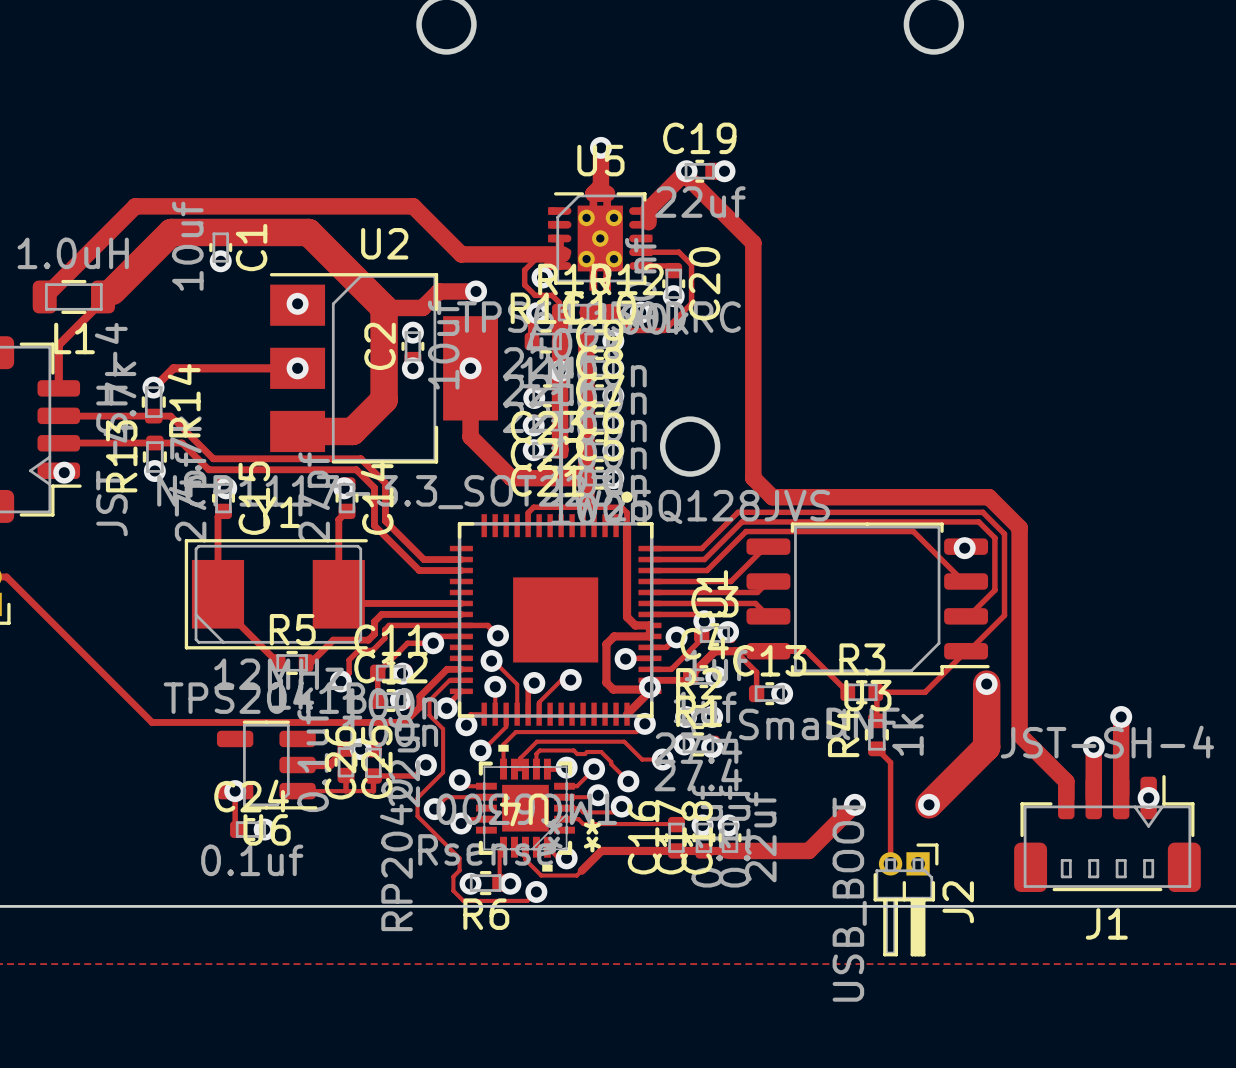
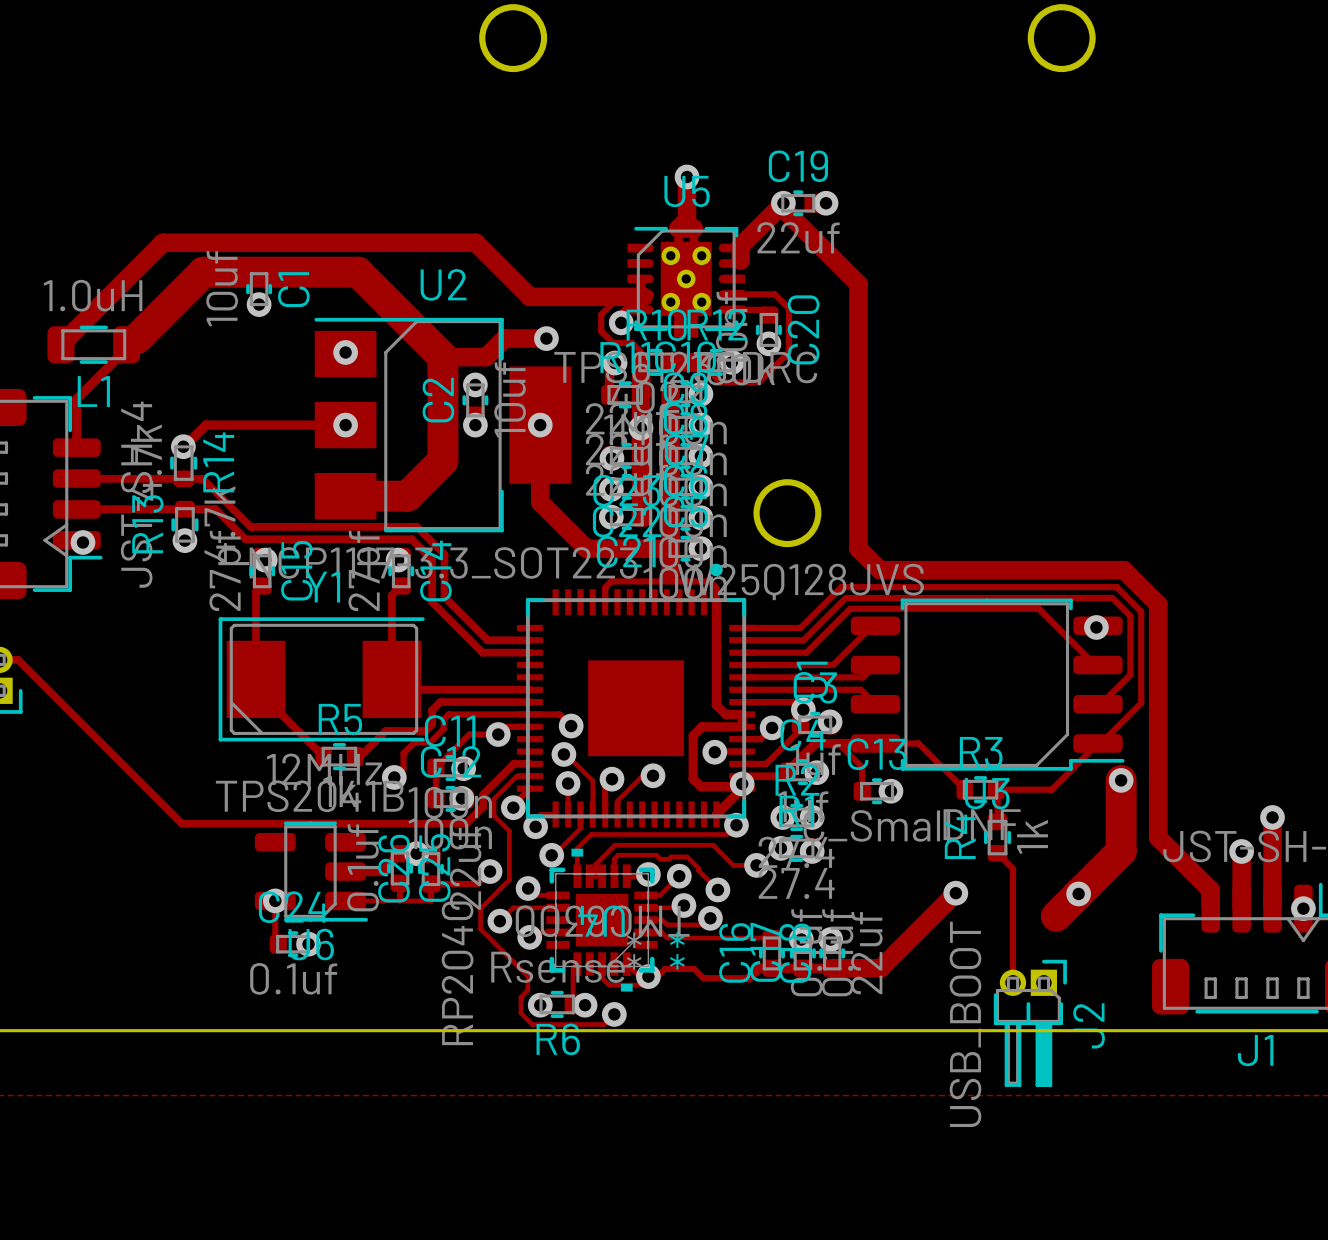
track: (854, 804) (808, 850) (773, 850) -> (955, 893) (880, 968)
via position: (854, 804) -> (955, 893)
via position: (929, 804) -> (1078, 893)
track: (664, 850) (601, 850) (576, 875) (541, 875) (531, 865) -> (758, 968) (748, 978) (703, 978) (694, 968) (665, 968) (649, 985) (608, 985)

